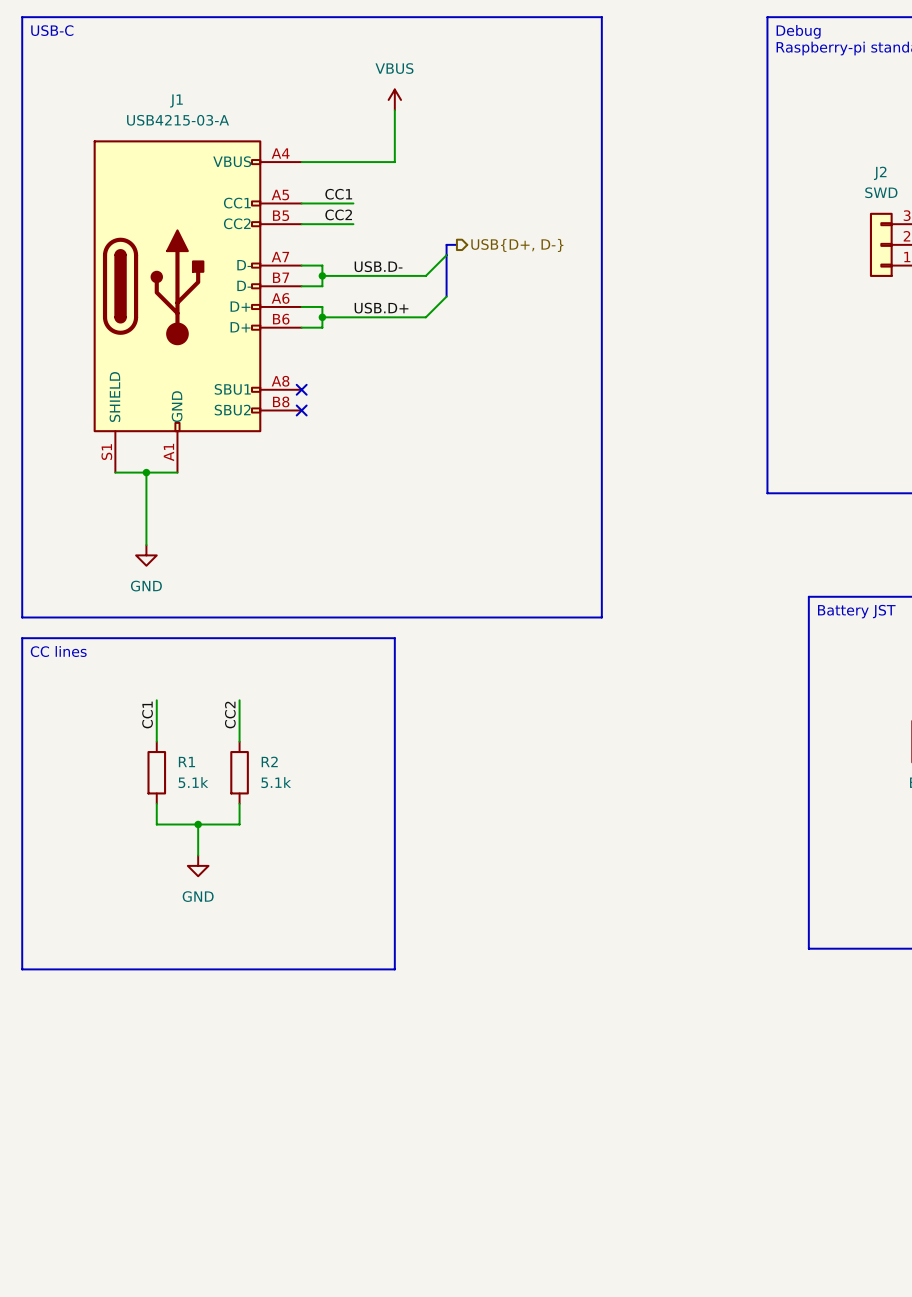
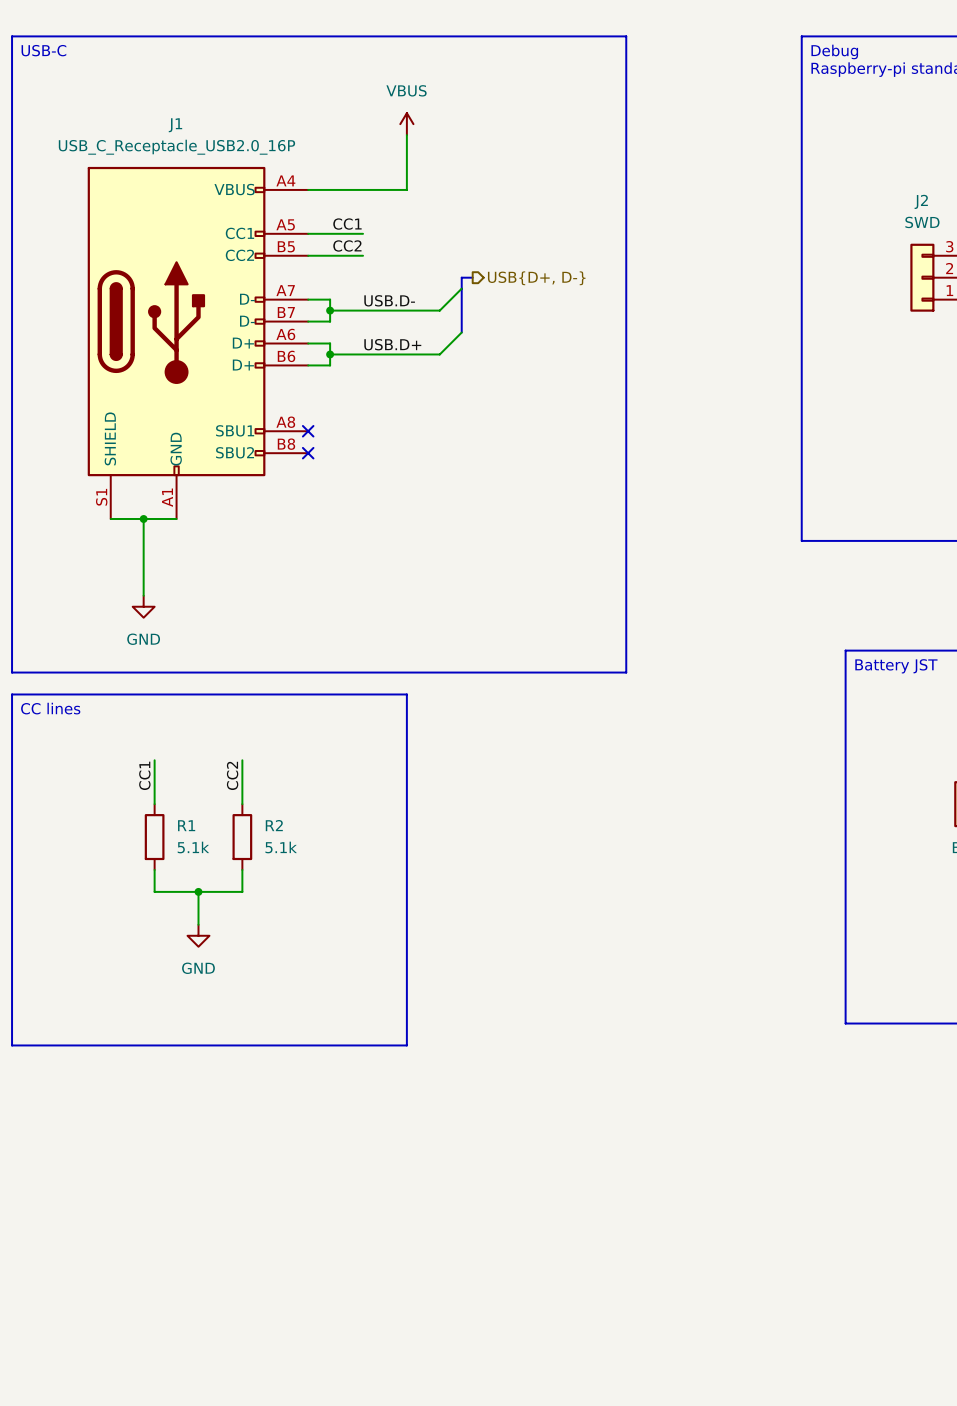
J1 value: USB4215-03-A (178, 120) -> USB_C_Receptacle_USB2.0_16P (176, 147)

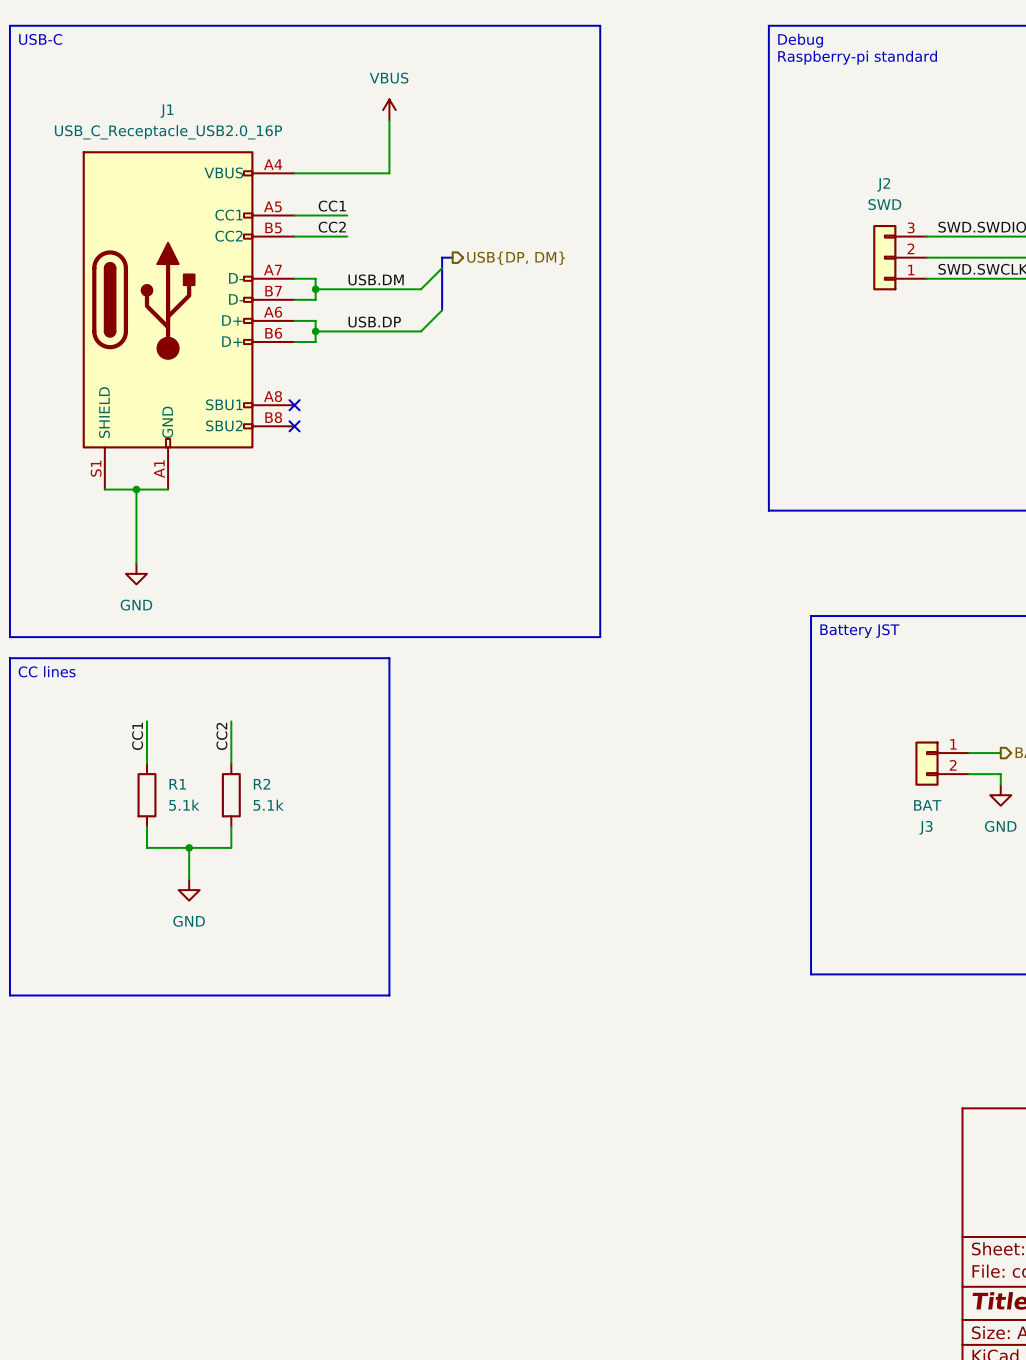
hierarchical label: USB{D+, D-} (536, 278) -> USB{DP, DM} (516, 258)
label: USB.D- (389, 300) -> USB.DM (376, 279)
label: USB.D+ (392, 344) -> USB.DP (374, 322)

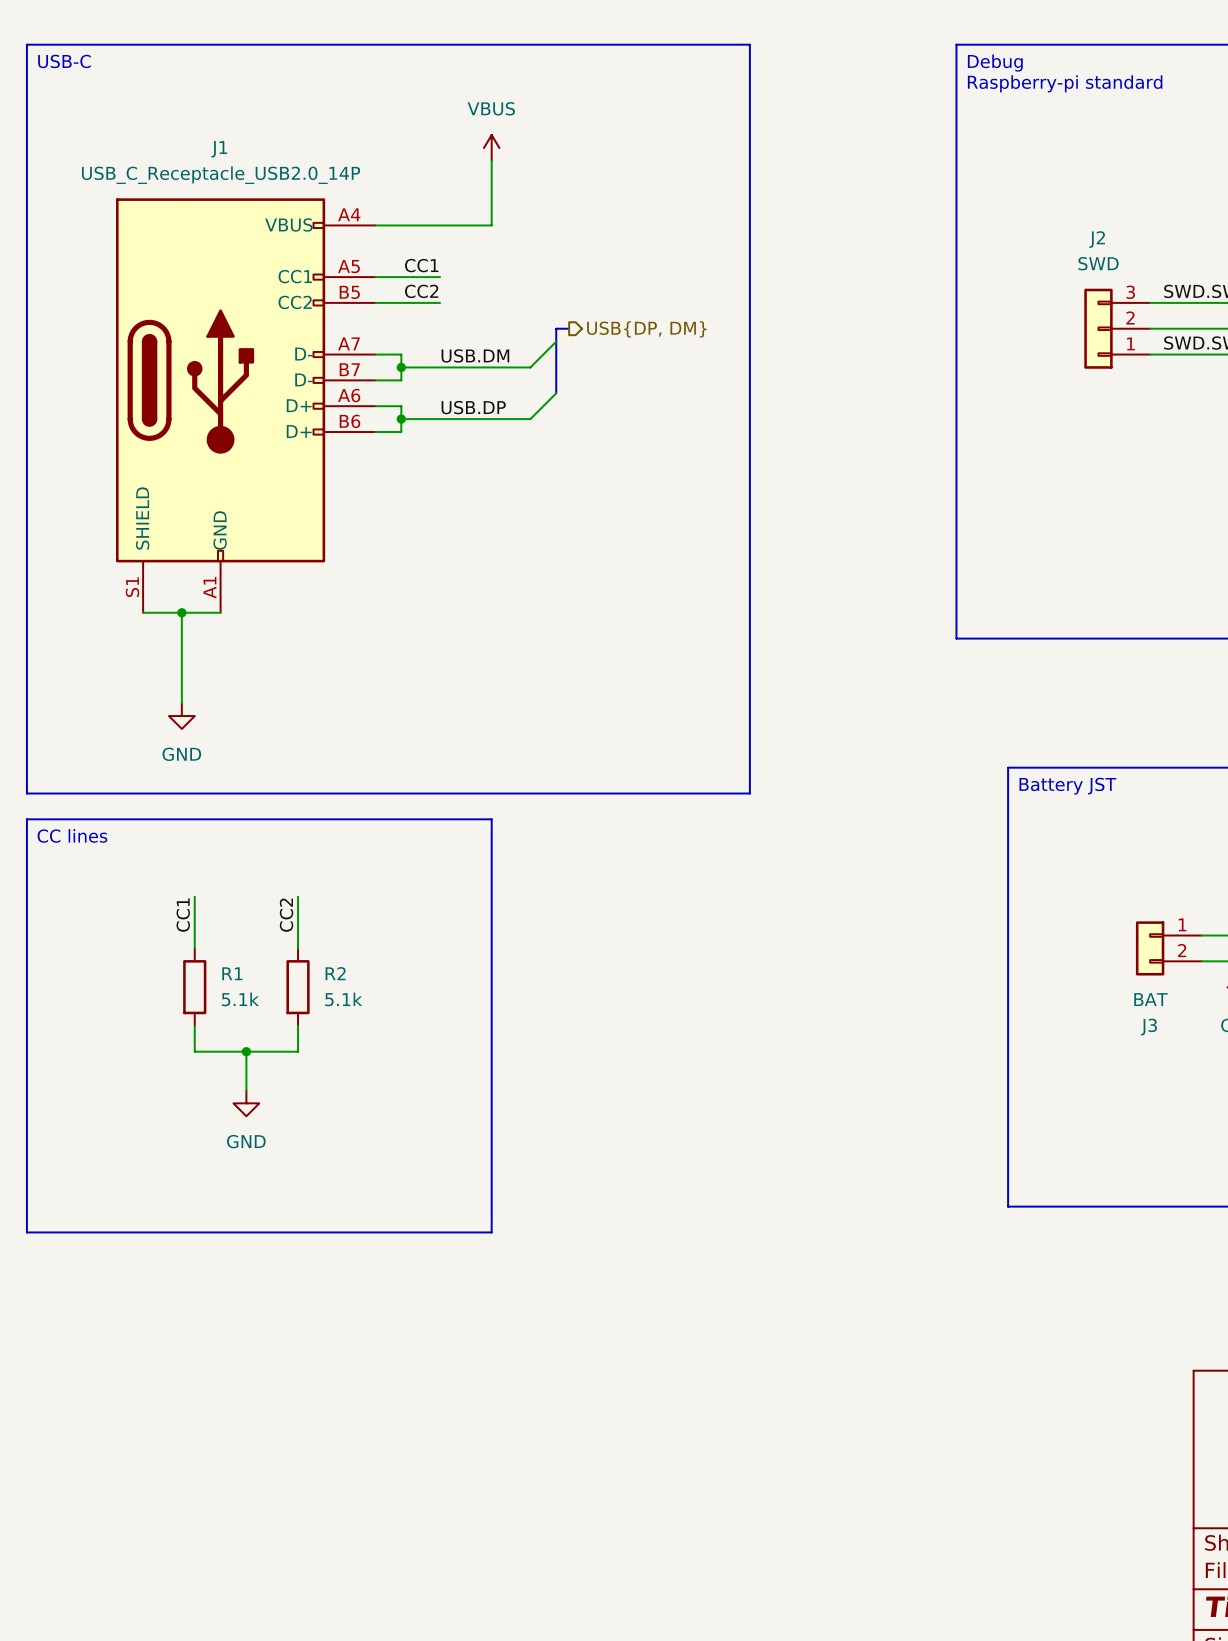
J1 value: USB_C_Receptacle_USB2.0_16P (168, 132) -> USB_C_Receptacle_USB2.0_14P (221, 175)
J1 symbol: [82, 151, 295, 490] -> [116, 198, 376, 613]
no-connect mark: (294, 405) -> none
no-connect mark: (294, 426) -> none

